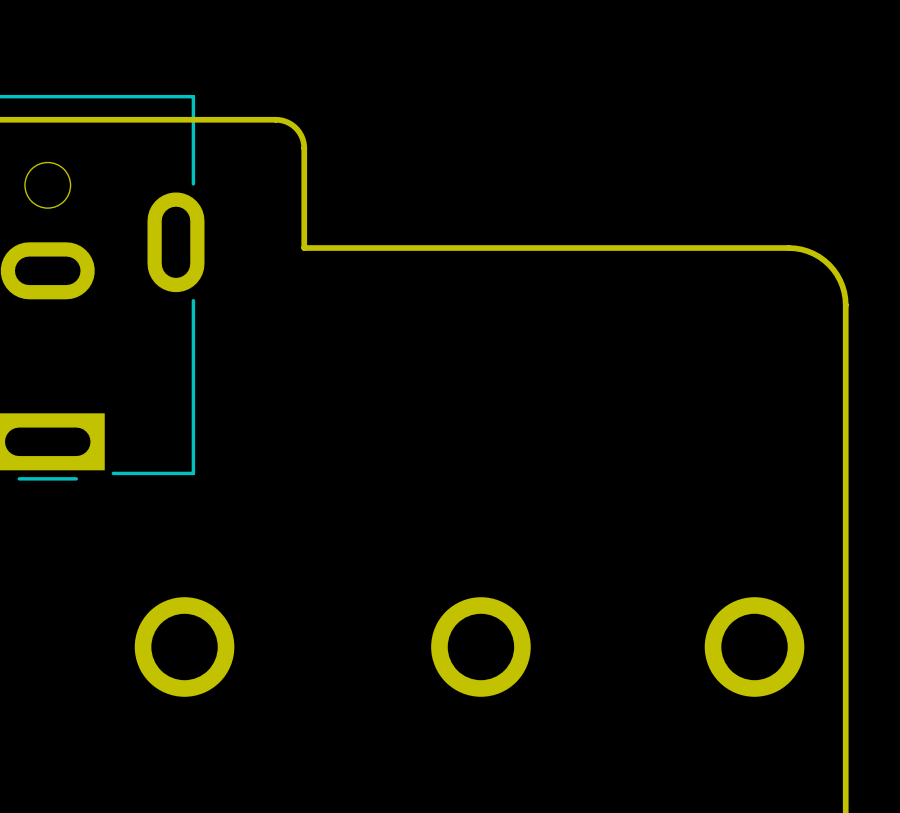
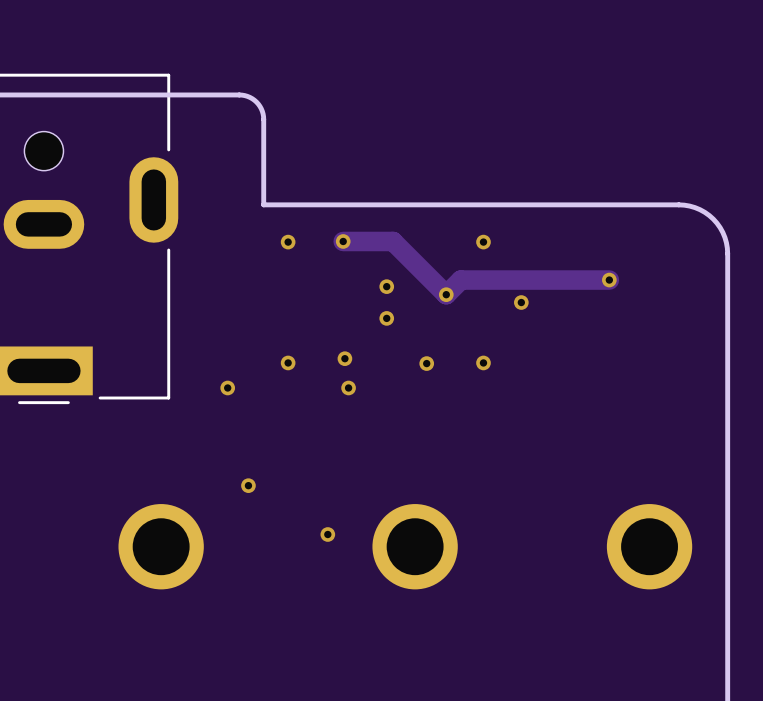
track: none -> (343, 241) (393, 241) (446, 294) (460, 280) (609, 280)
via: none -> (343, 241)
via: none -> (288, 242)
via: none -> (483, 242)
via: none -> (609, 280)
via: none -> (386, 286)
via: none -> (446, 294)
via: none -> (521, 302)
via: none -> (386, 318)
via: none -> (344, 358)
via: none -> (288, 362)
via: none -> (483, 362)
via: none -> (426, 363)
via: none -> (227, 387)
via: none -> (348, 387)
via: none -> (248, 485)
via: none -> (327, 534)

